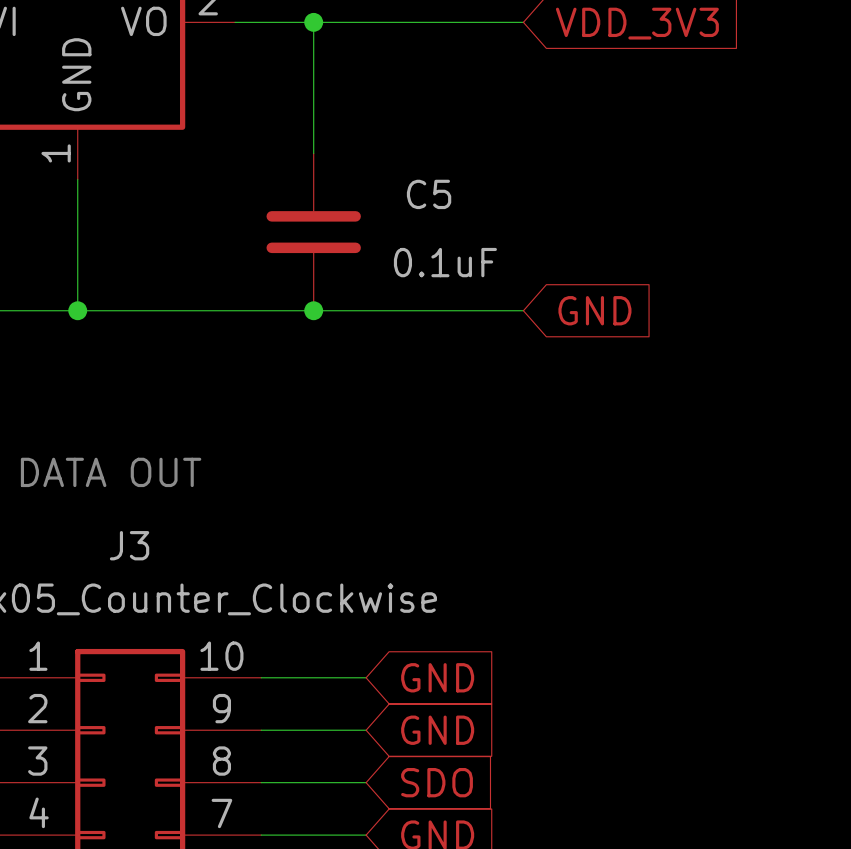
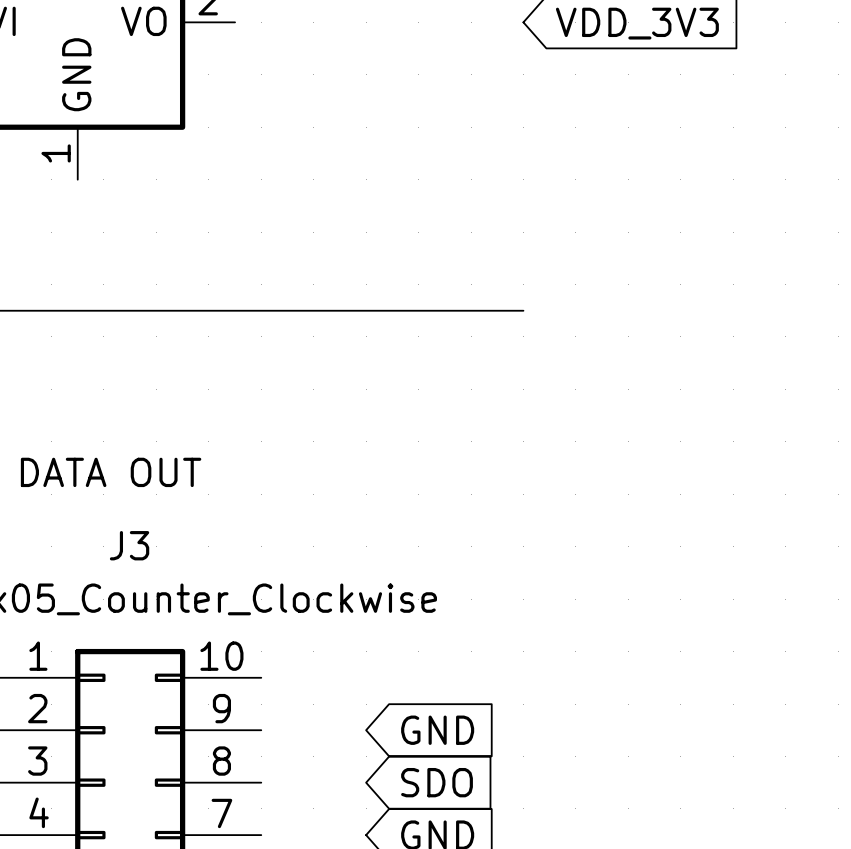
wire: (235, 22) (523, 22) -> none
wire: (313, 22) (313, 153) -> none
junction: (313, 22) -> none
wire: (77, 179) (77, 310) -> none
C5: 0.1uF (313, 232) -> none
junction: (77, 310) -> none
junction: (313, 310) -> none
global label: GND (594, 310) -> none
wire: (261, 677) (366, 677) -> none
global label: GND (437, 677) -> none
wire: (261, 730) (366, 730) -> none
wire: (261, 782) (366, 782) -> none
wire: (261, 835) (366, 835) -> none

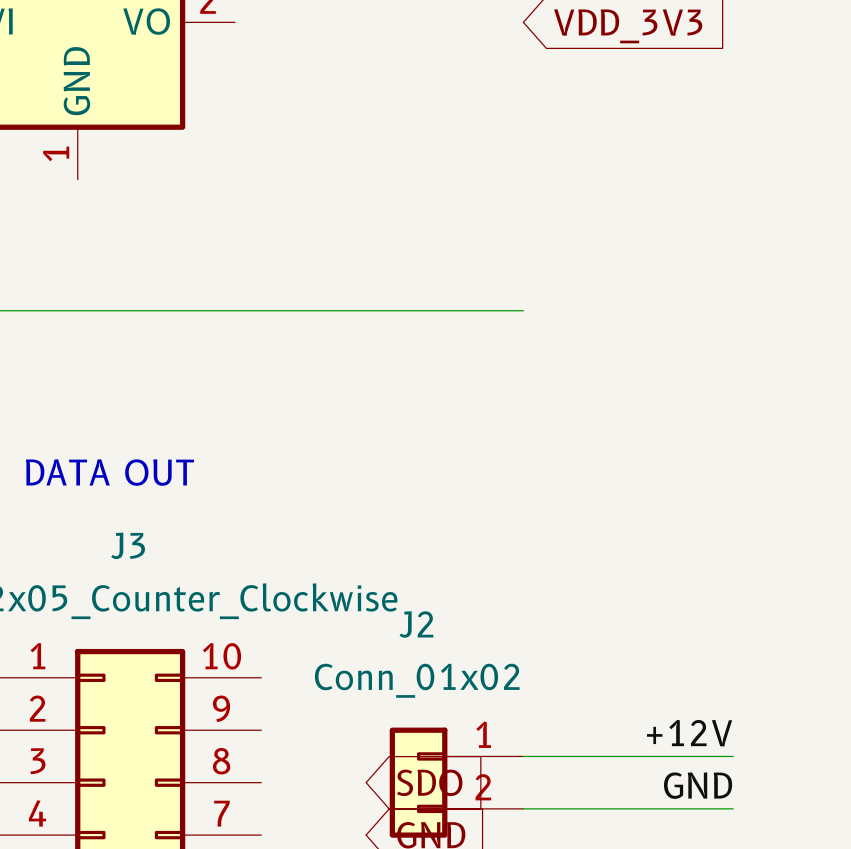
global label: GND (437, 730) -> none
label: none -> +12V (689, 733)
wire: none -> (523, 756) (733, 756)
J2: none -> Conn_01x02 (456, 782)
label: none -> GND (698, 785)
wire: none -> (523, 808) (733, 808)

